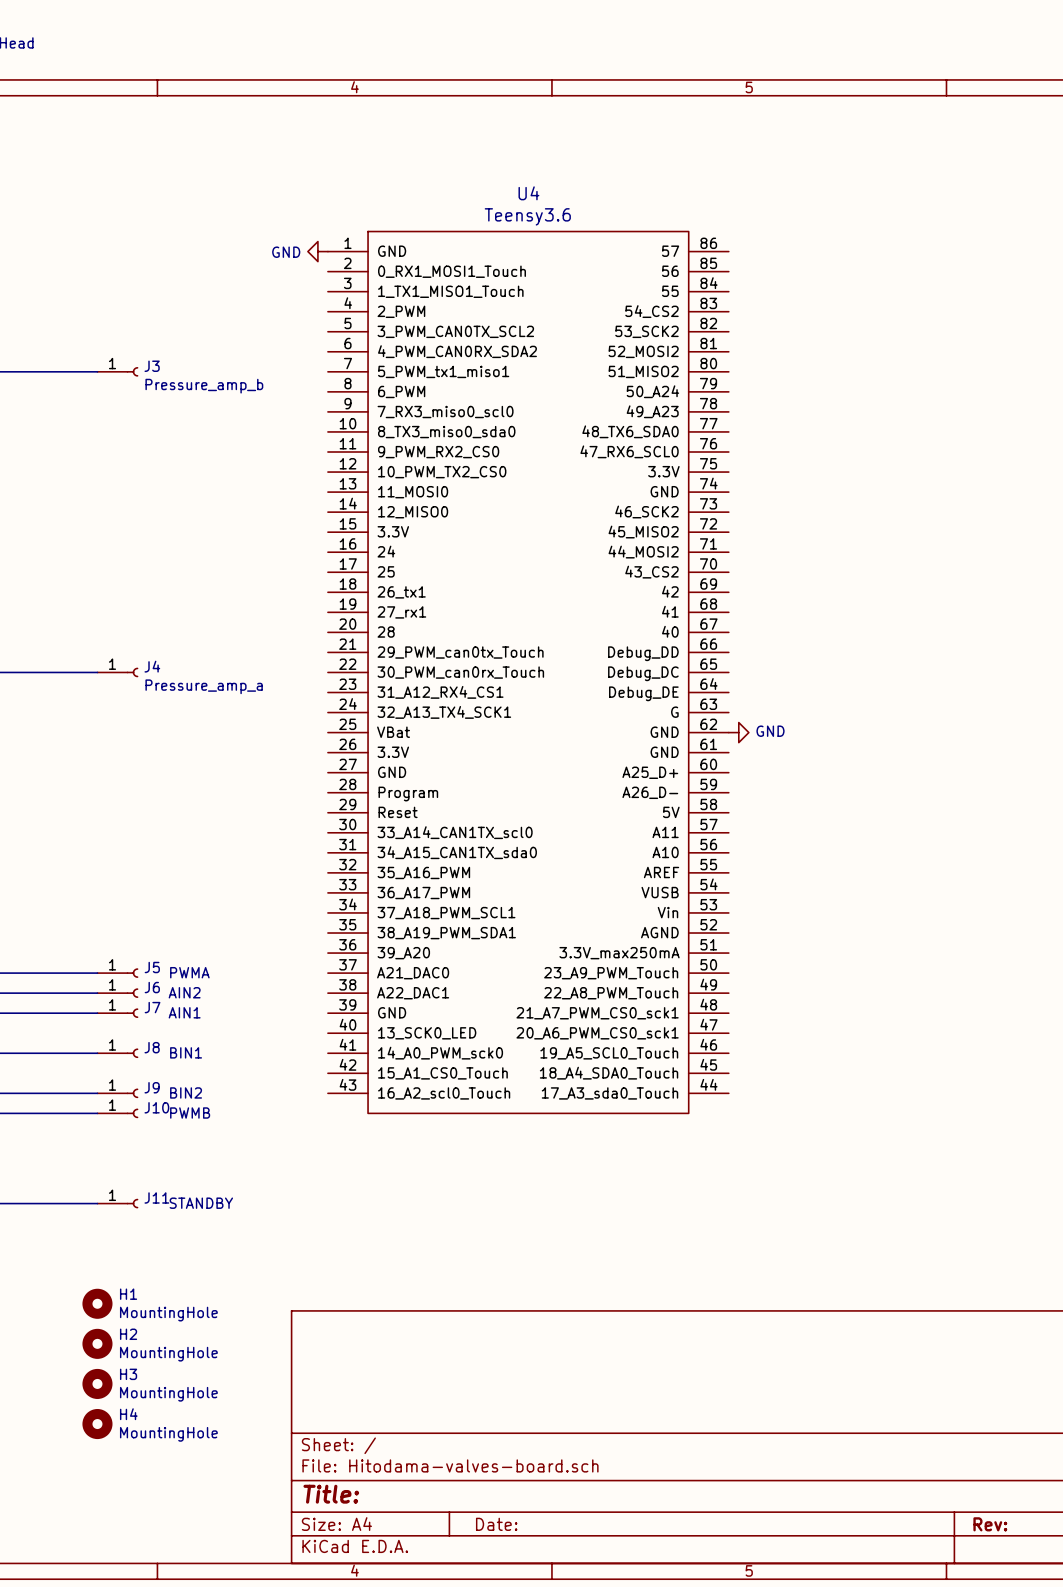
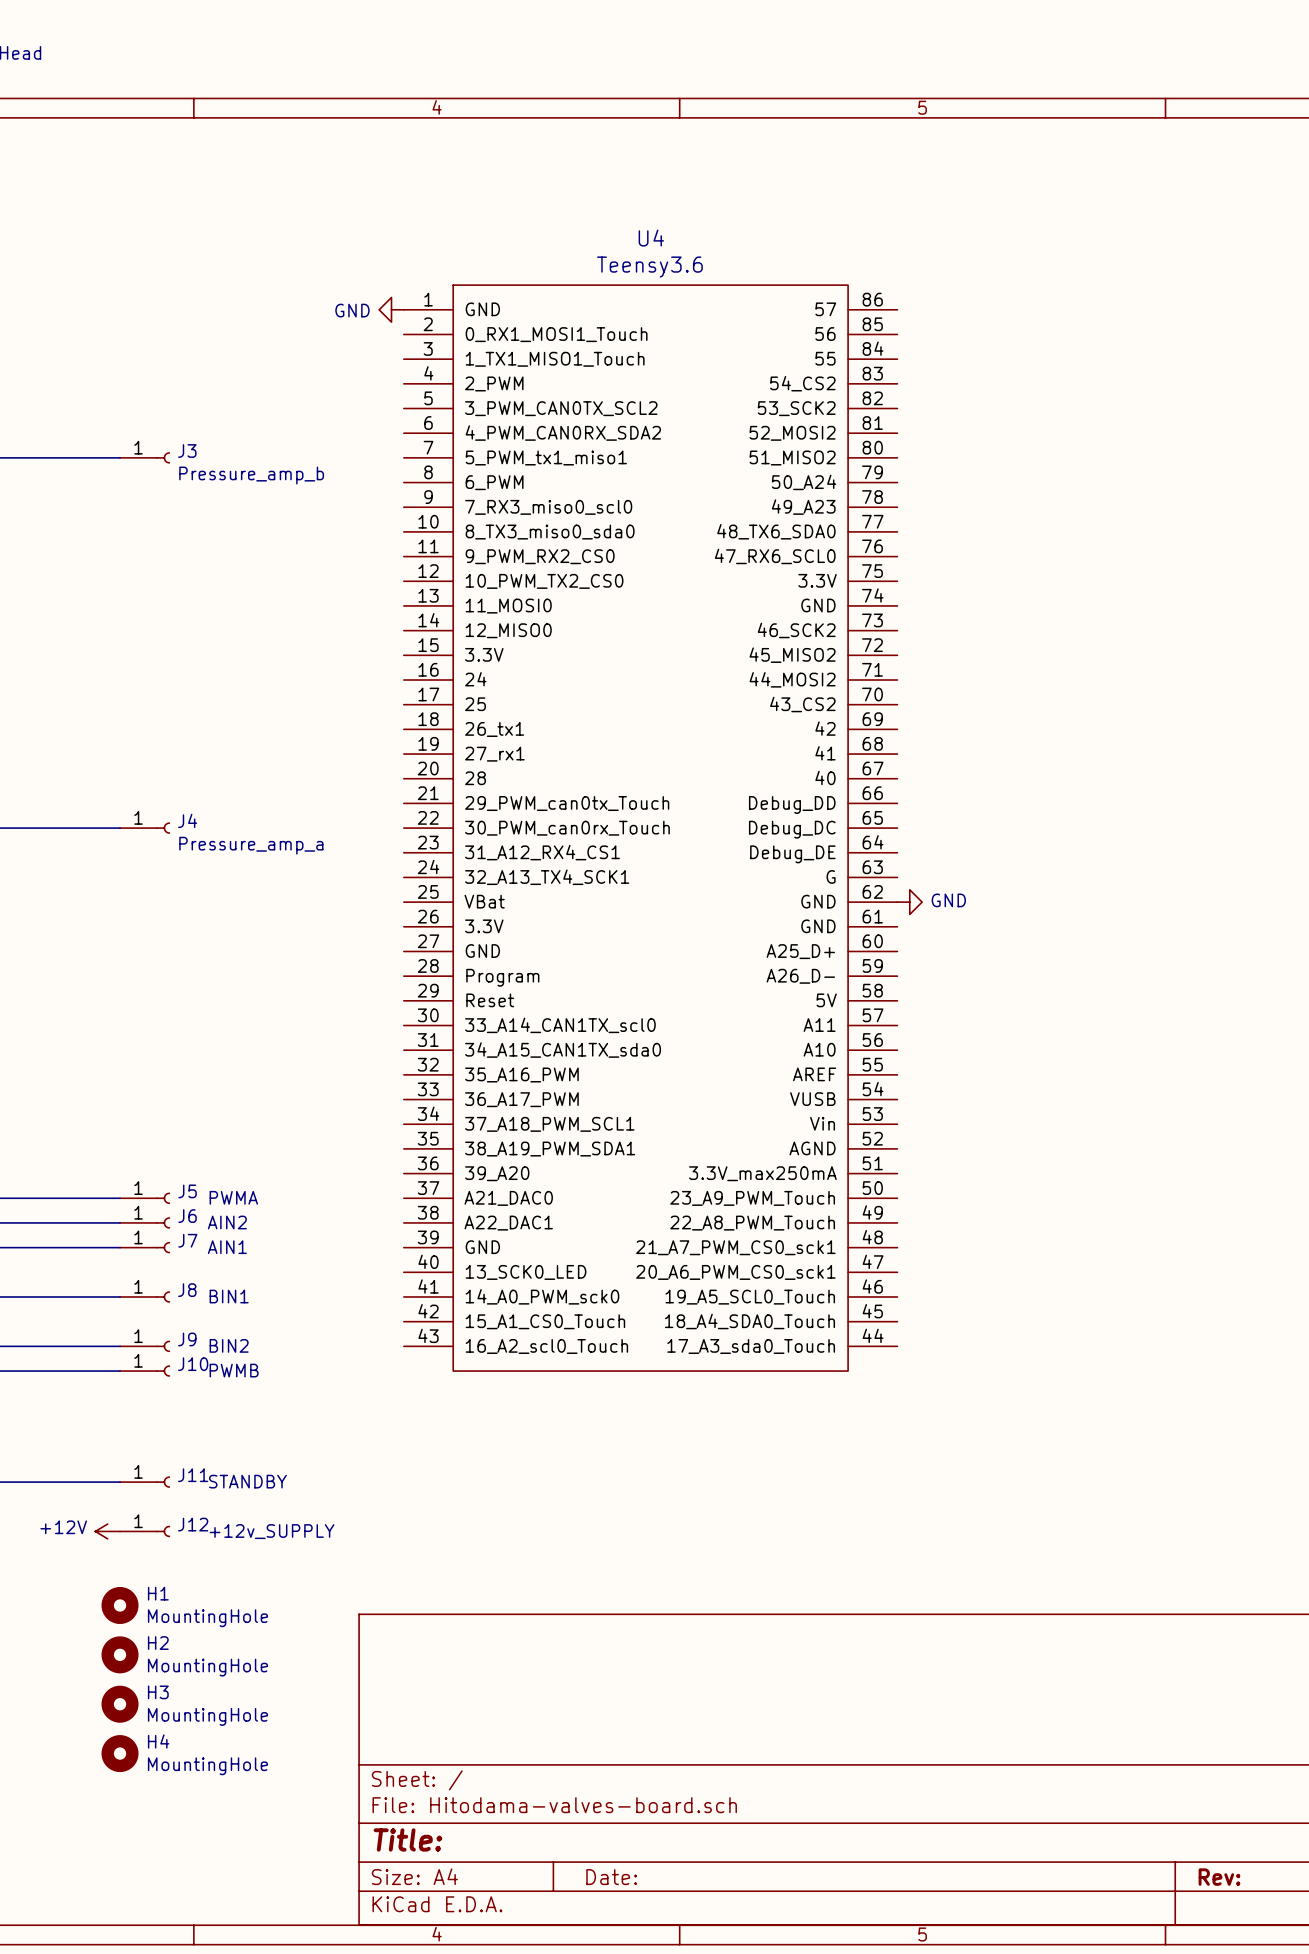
power symbol: none -> +12V (107, 1531)
J12: none -> +12v_SUPPLY (145, 1531)

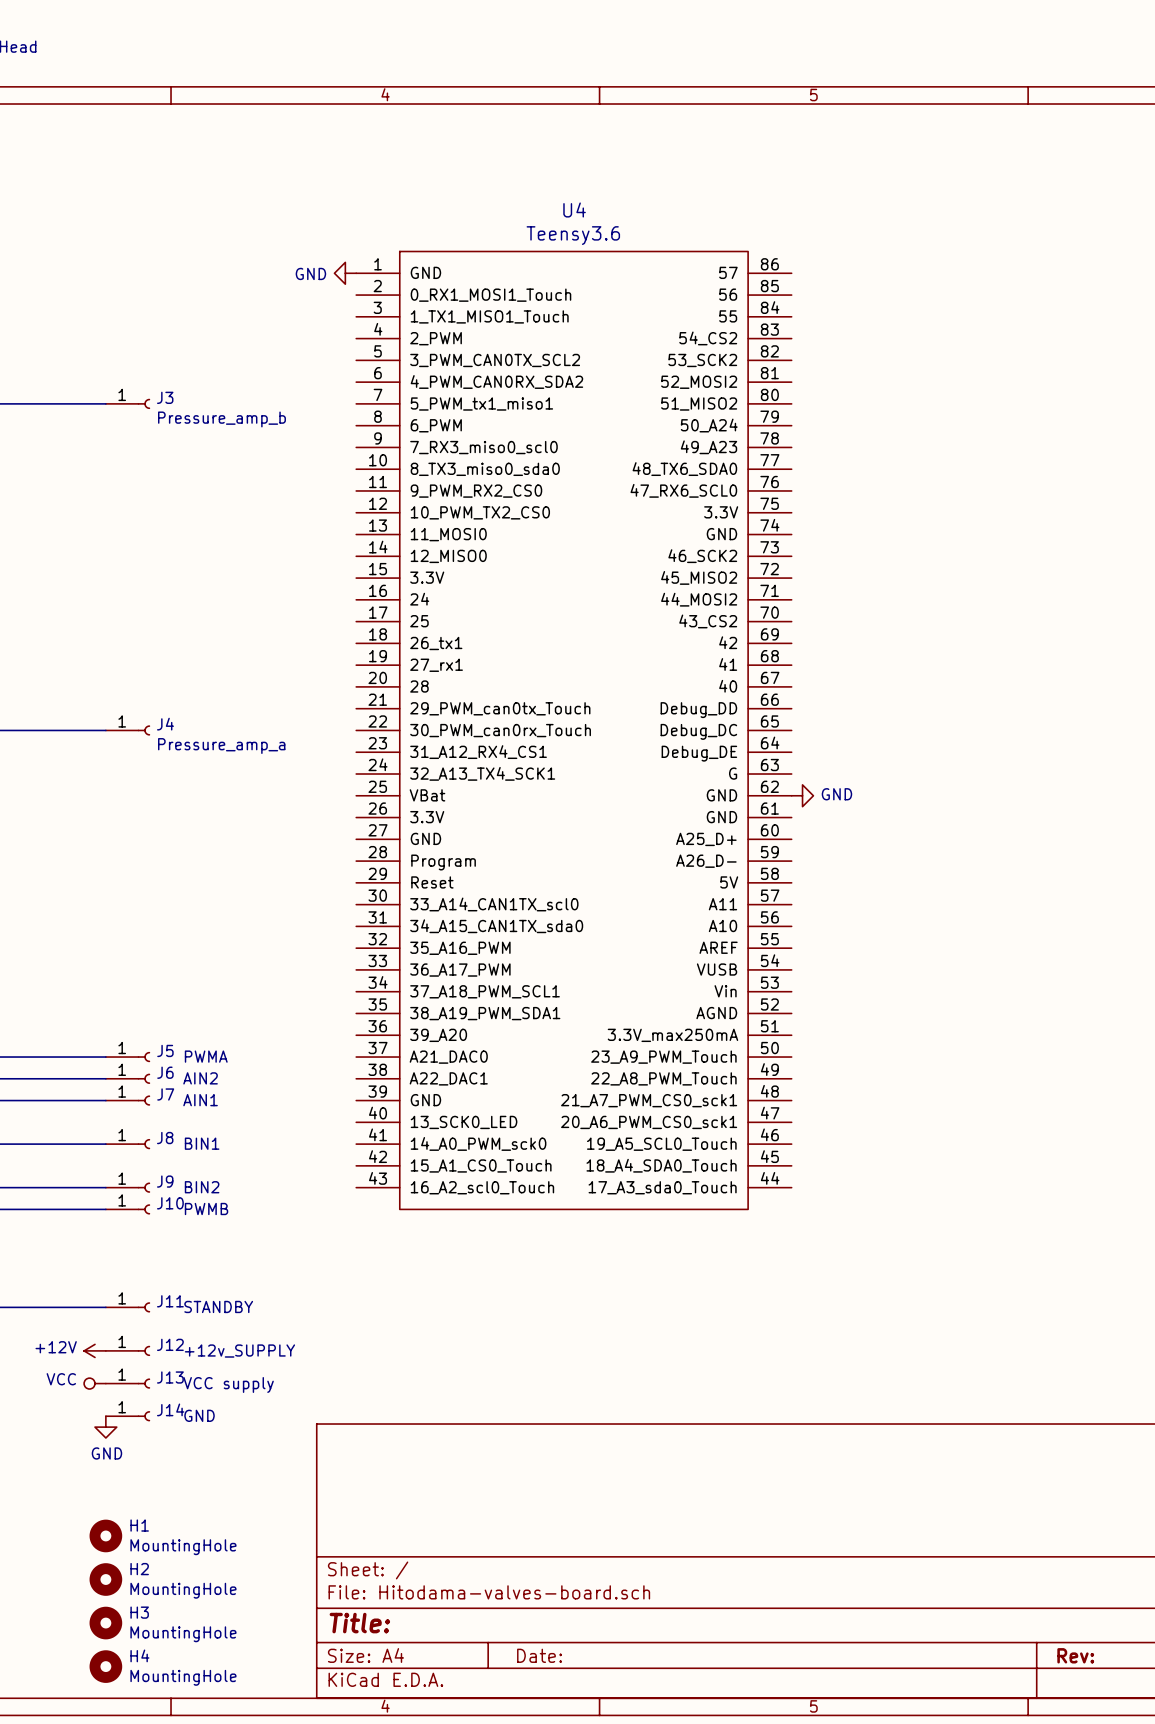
power symbol: none -> VCC (94, 1383)
J13: none -> VCC supply (127, 1383)
H1 position: (120, 1605) -> (105, 1535)
J14: none -> GND (127, 1416)
power symbol: none -> GND (105, 1427)
H2 position: (120, 1654) -> (105, 1579)
H3 position: (120, 1704) -> (105, 1623)
H4 position: (120, 1753) -> (105, 1666)

